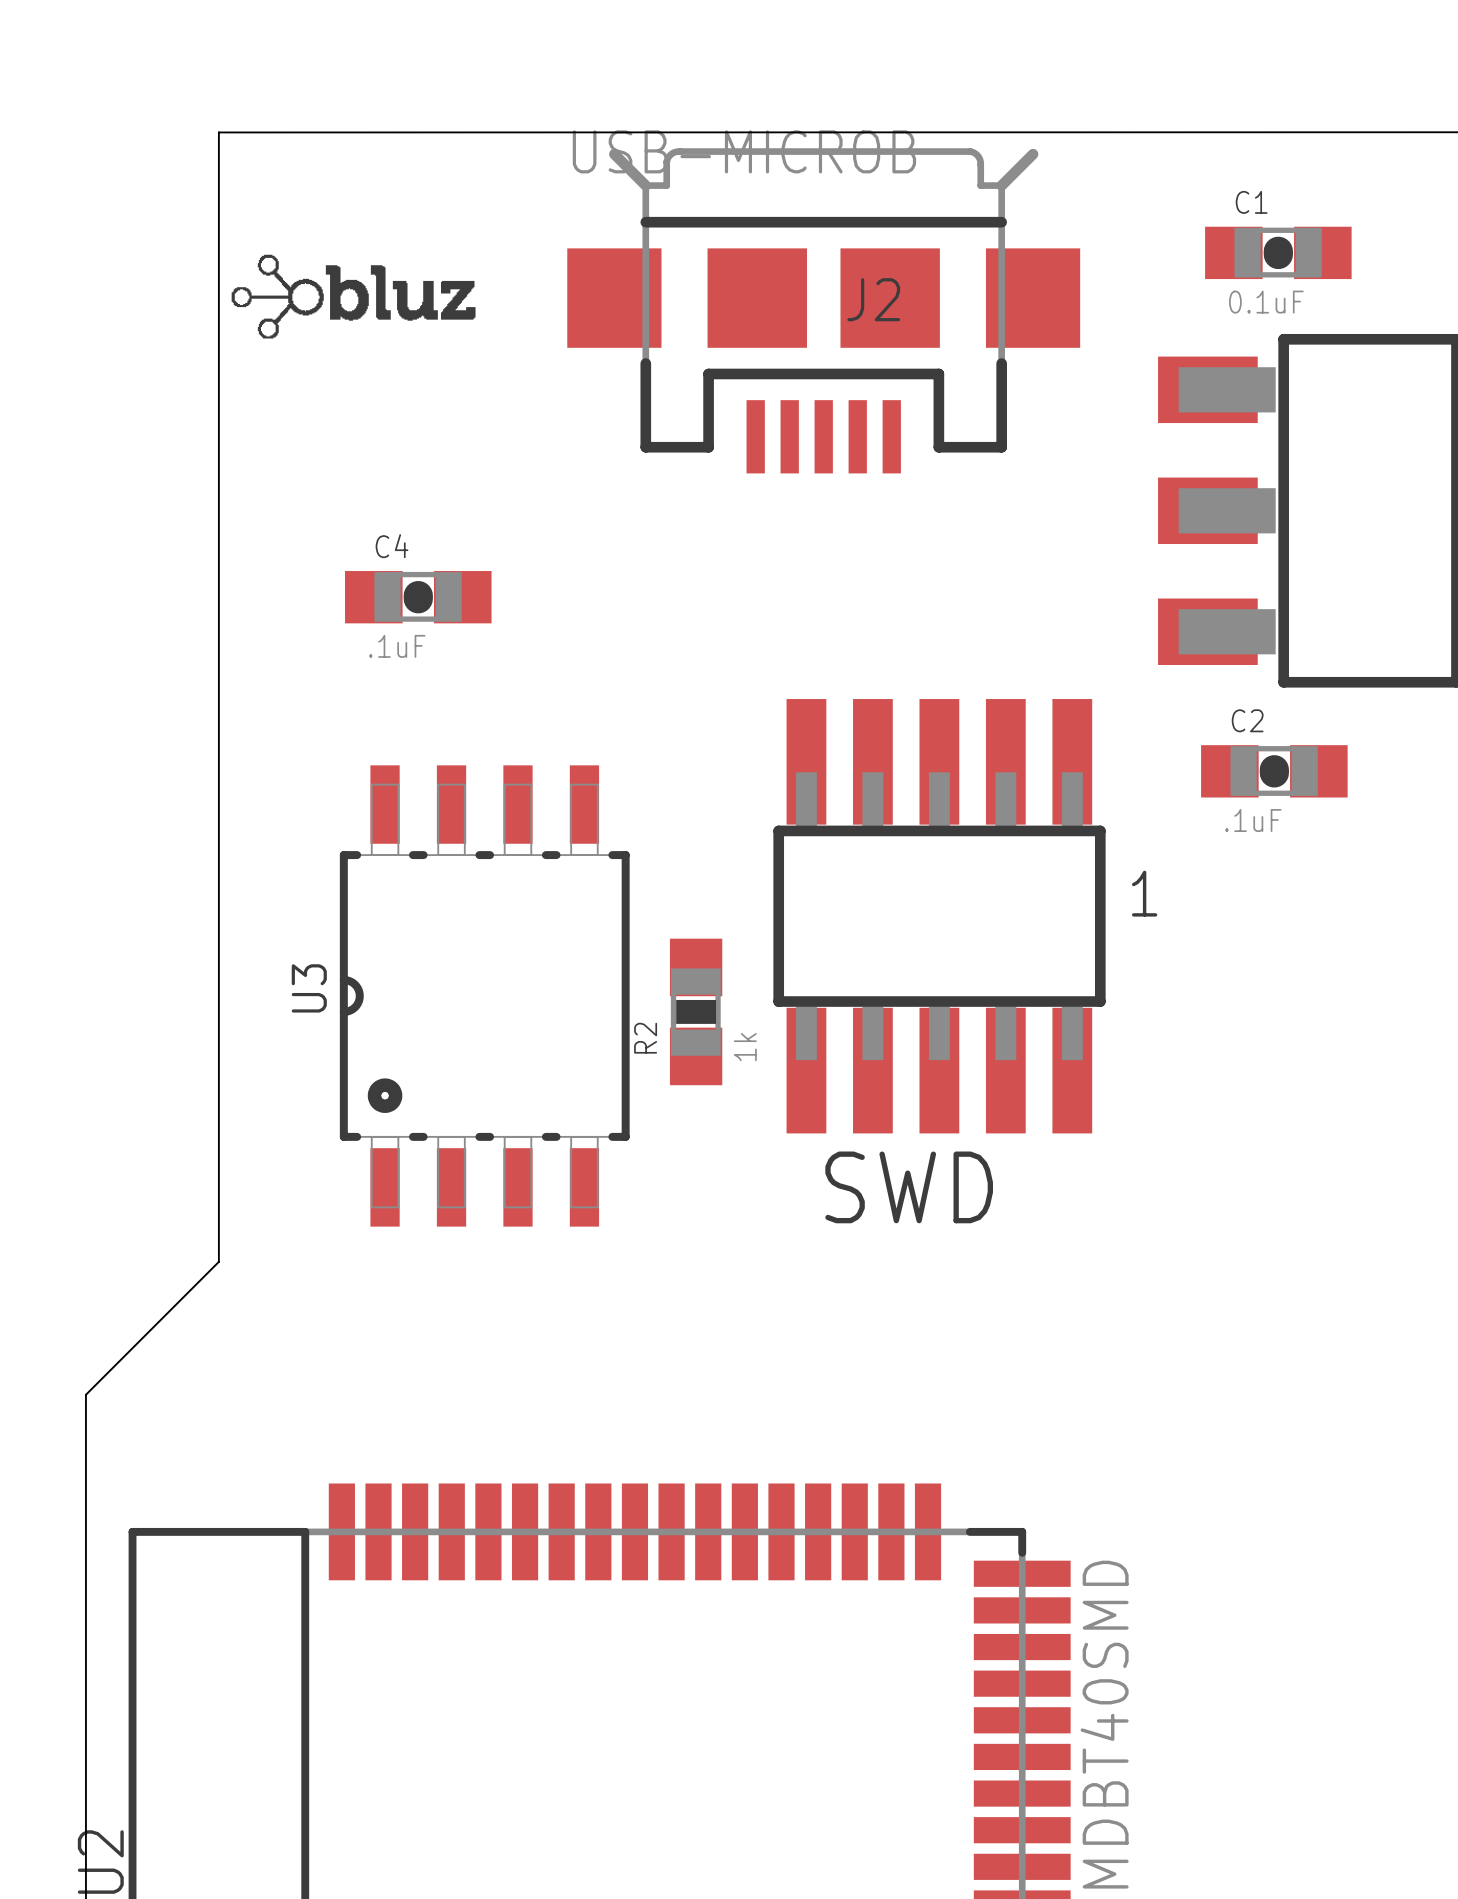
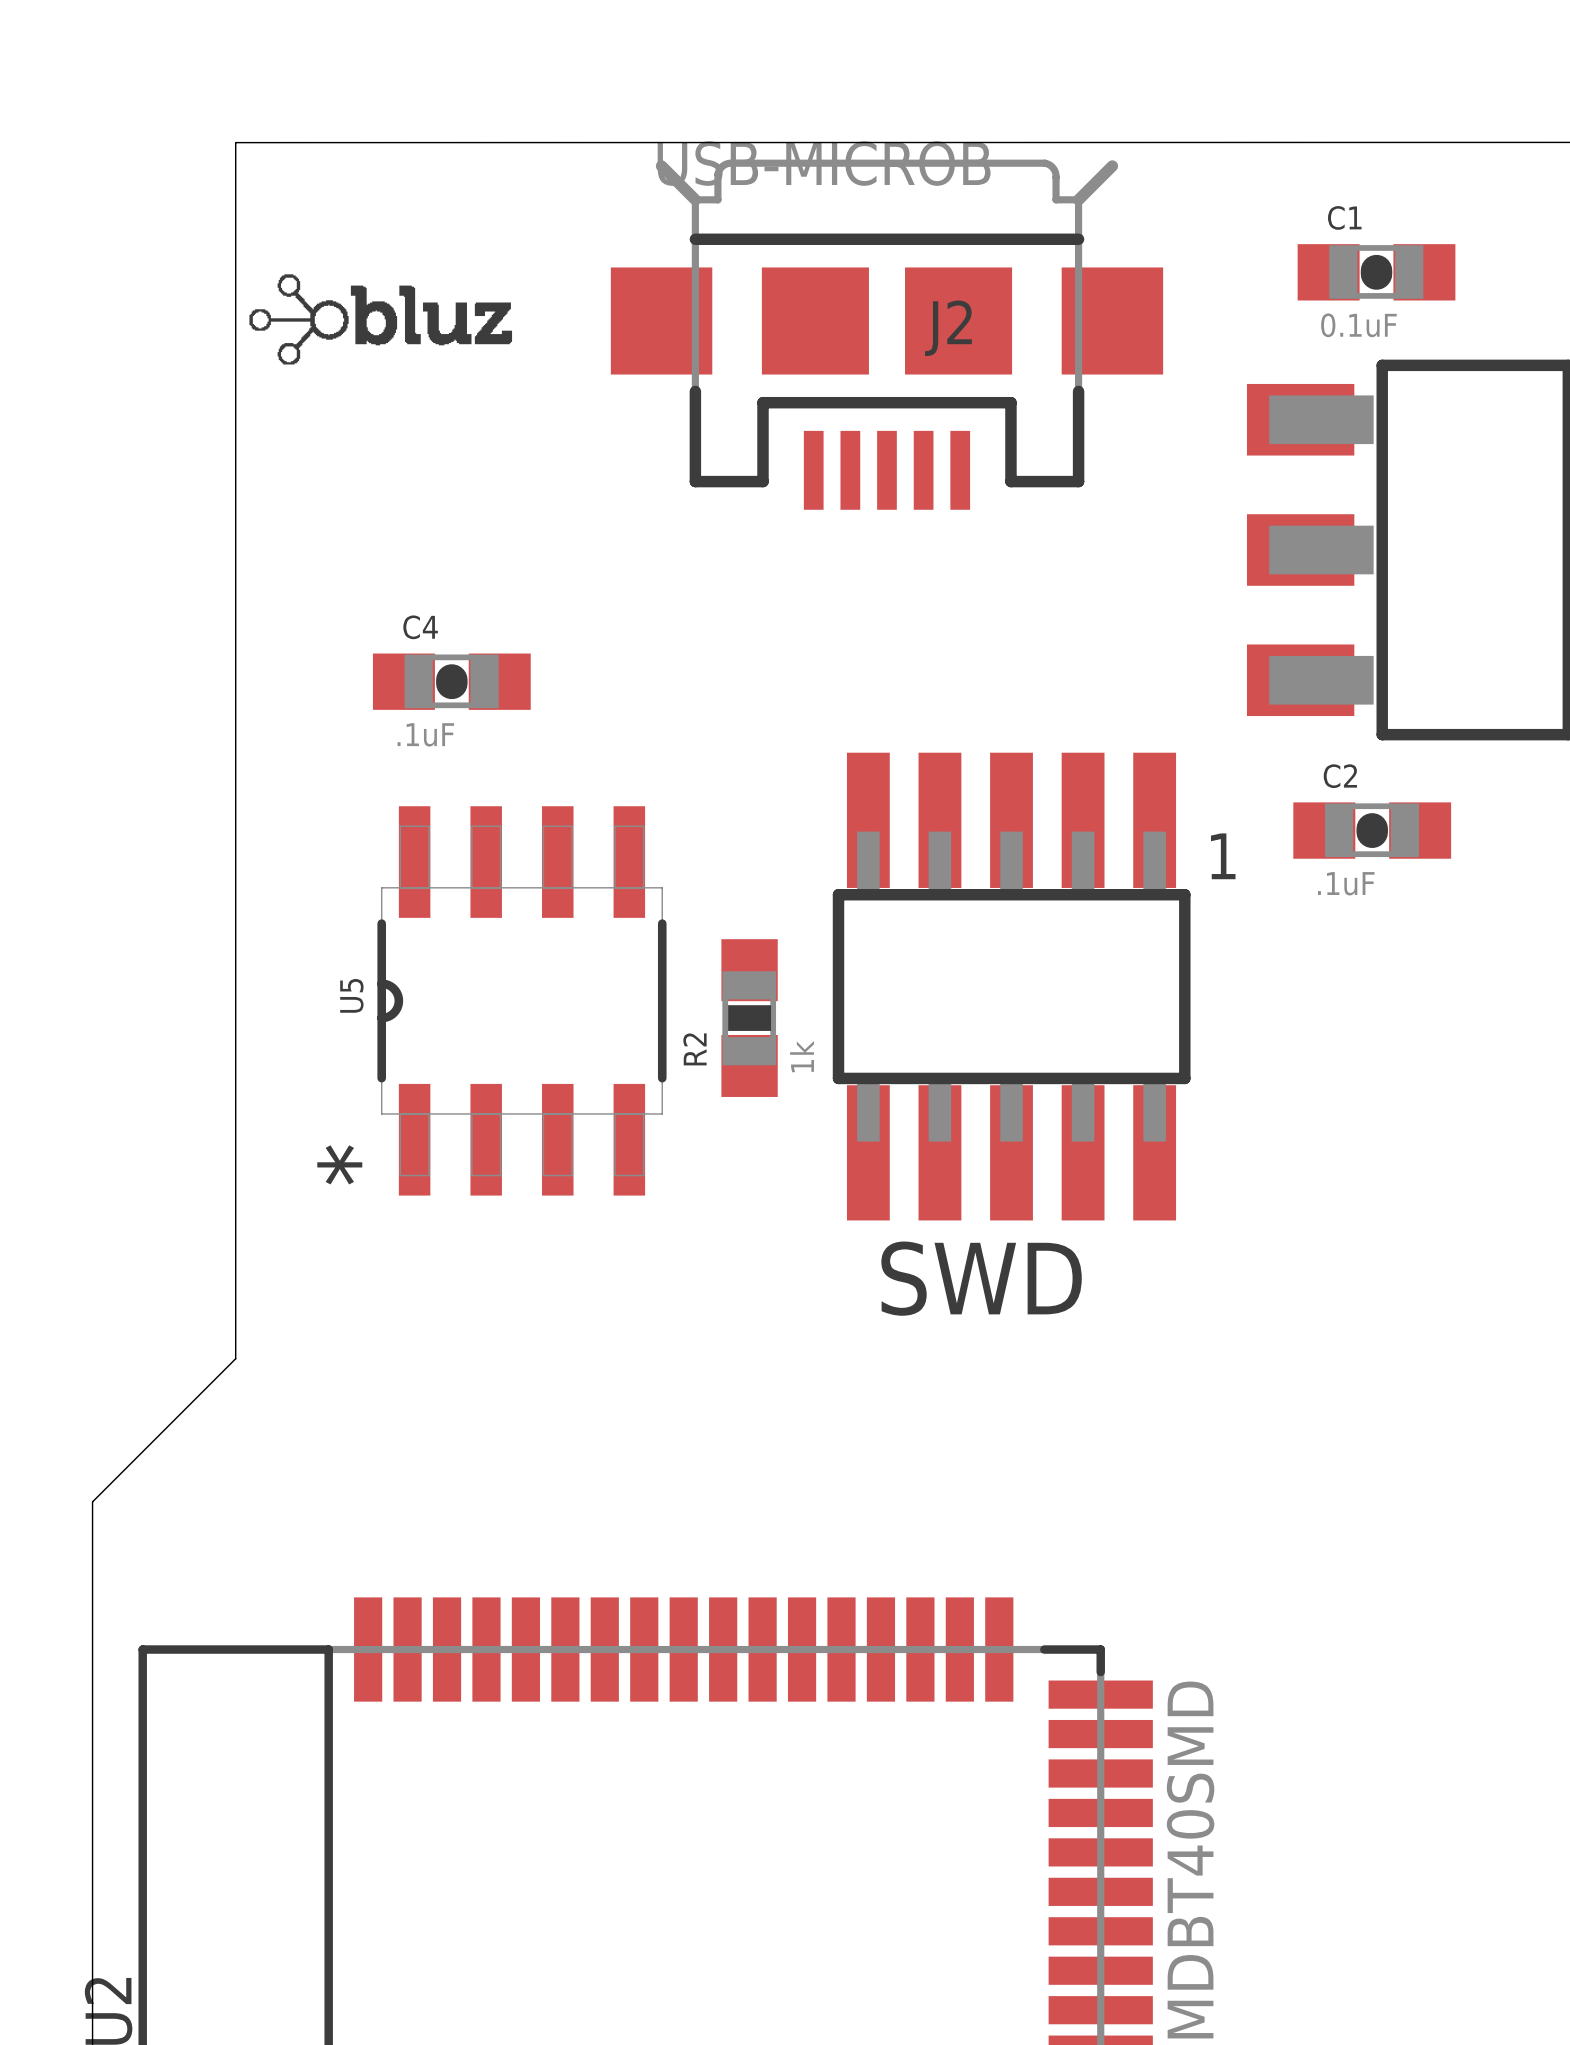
C4 position: (418, 597) -> (451, 681)
text position: 1 (1144, 893) -> 1 (1223, 856)
U5: none -> (521, 1000)
U3: (484, 995) -> none
R2 position: (696, 1011) -> (749, 1018)

